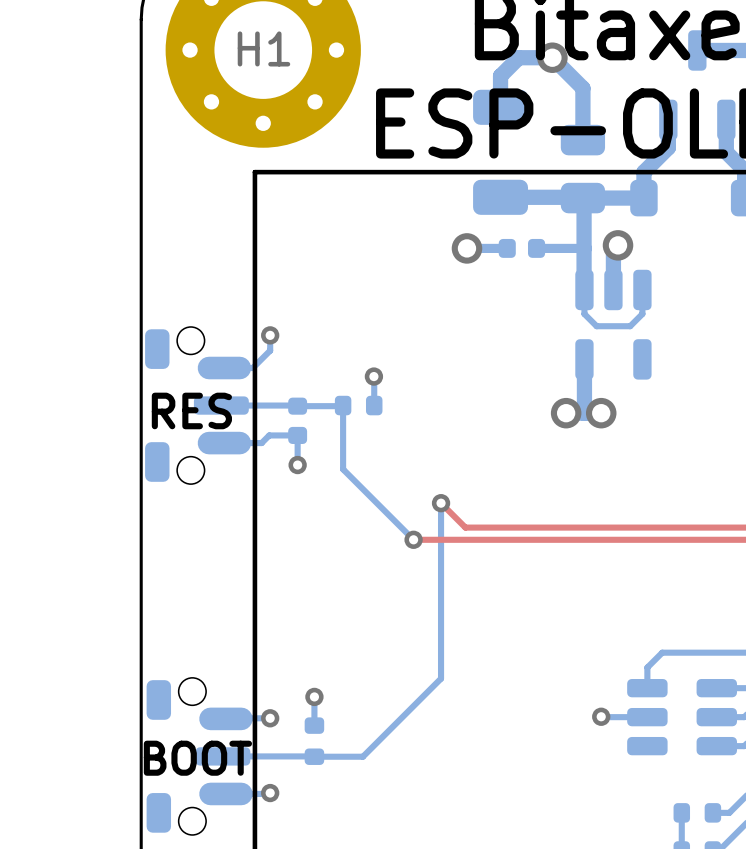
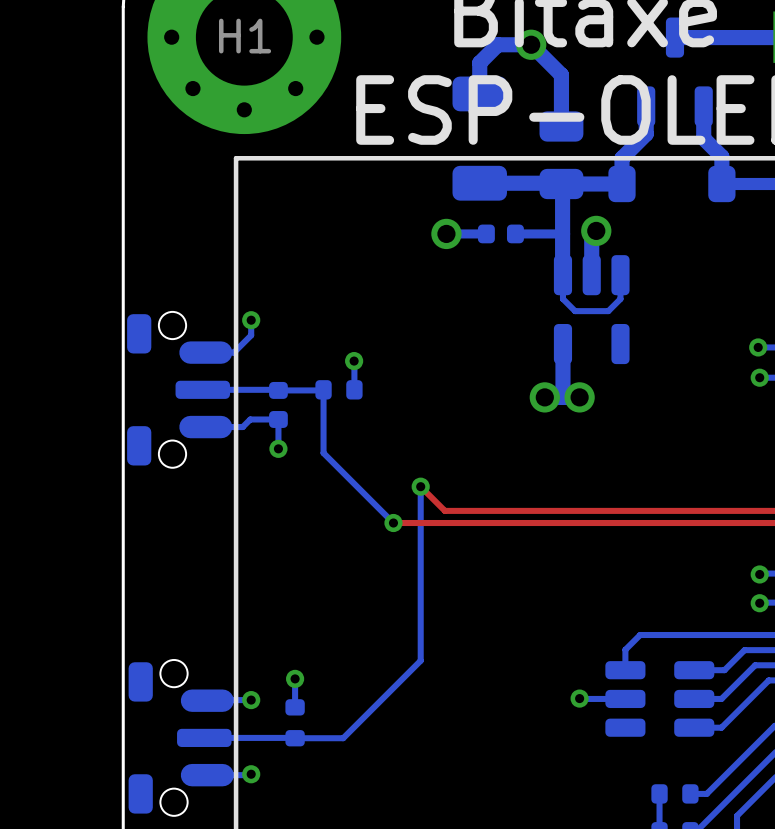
text: RES (191, 410) -> none
text: BOOT (197, 758) -> none

